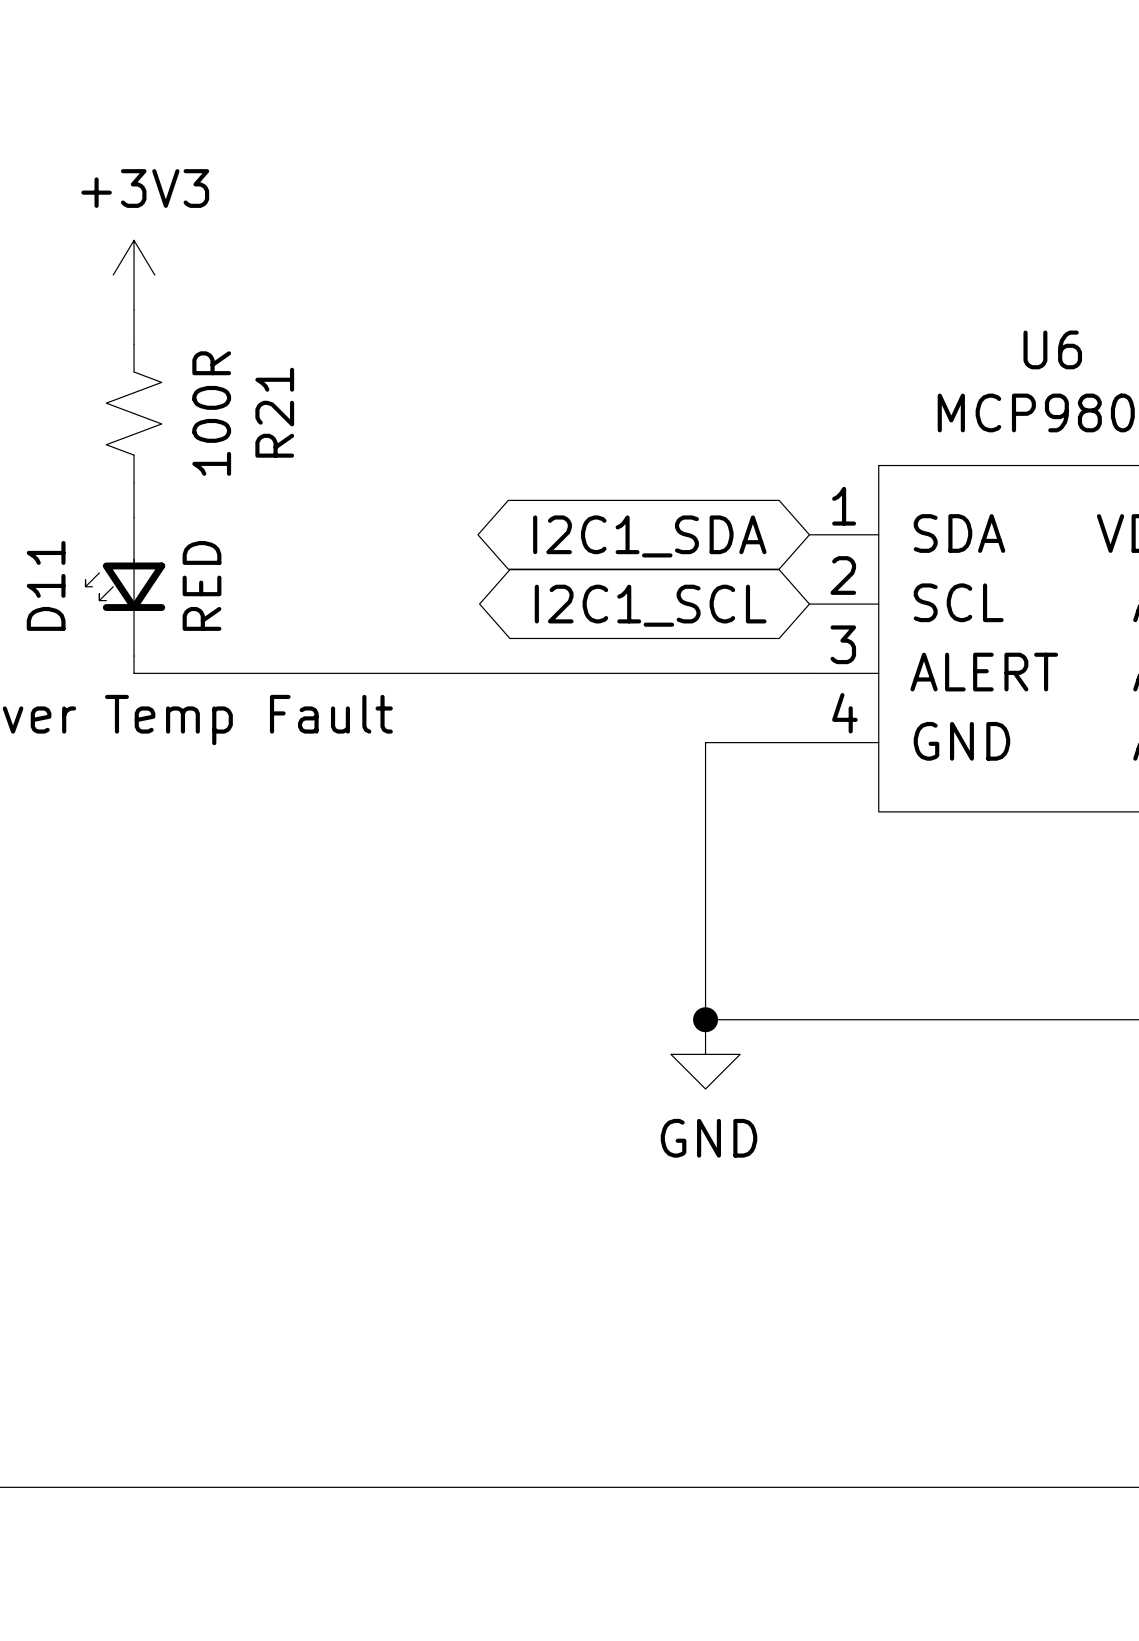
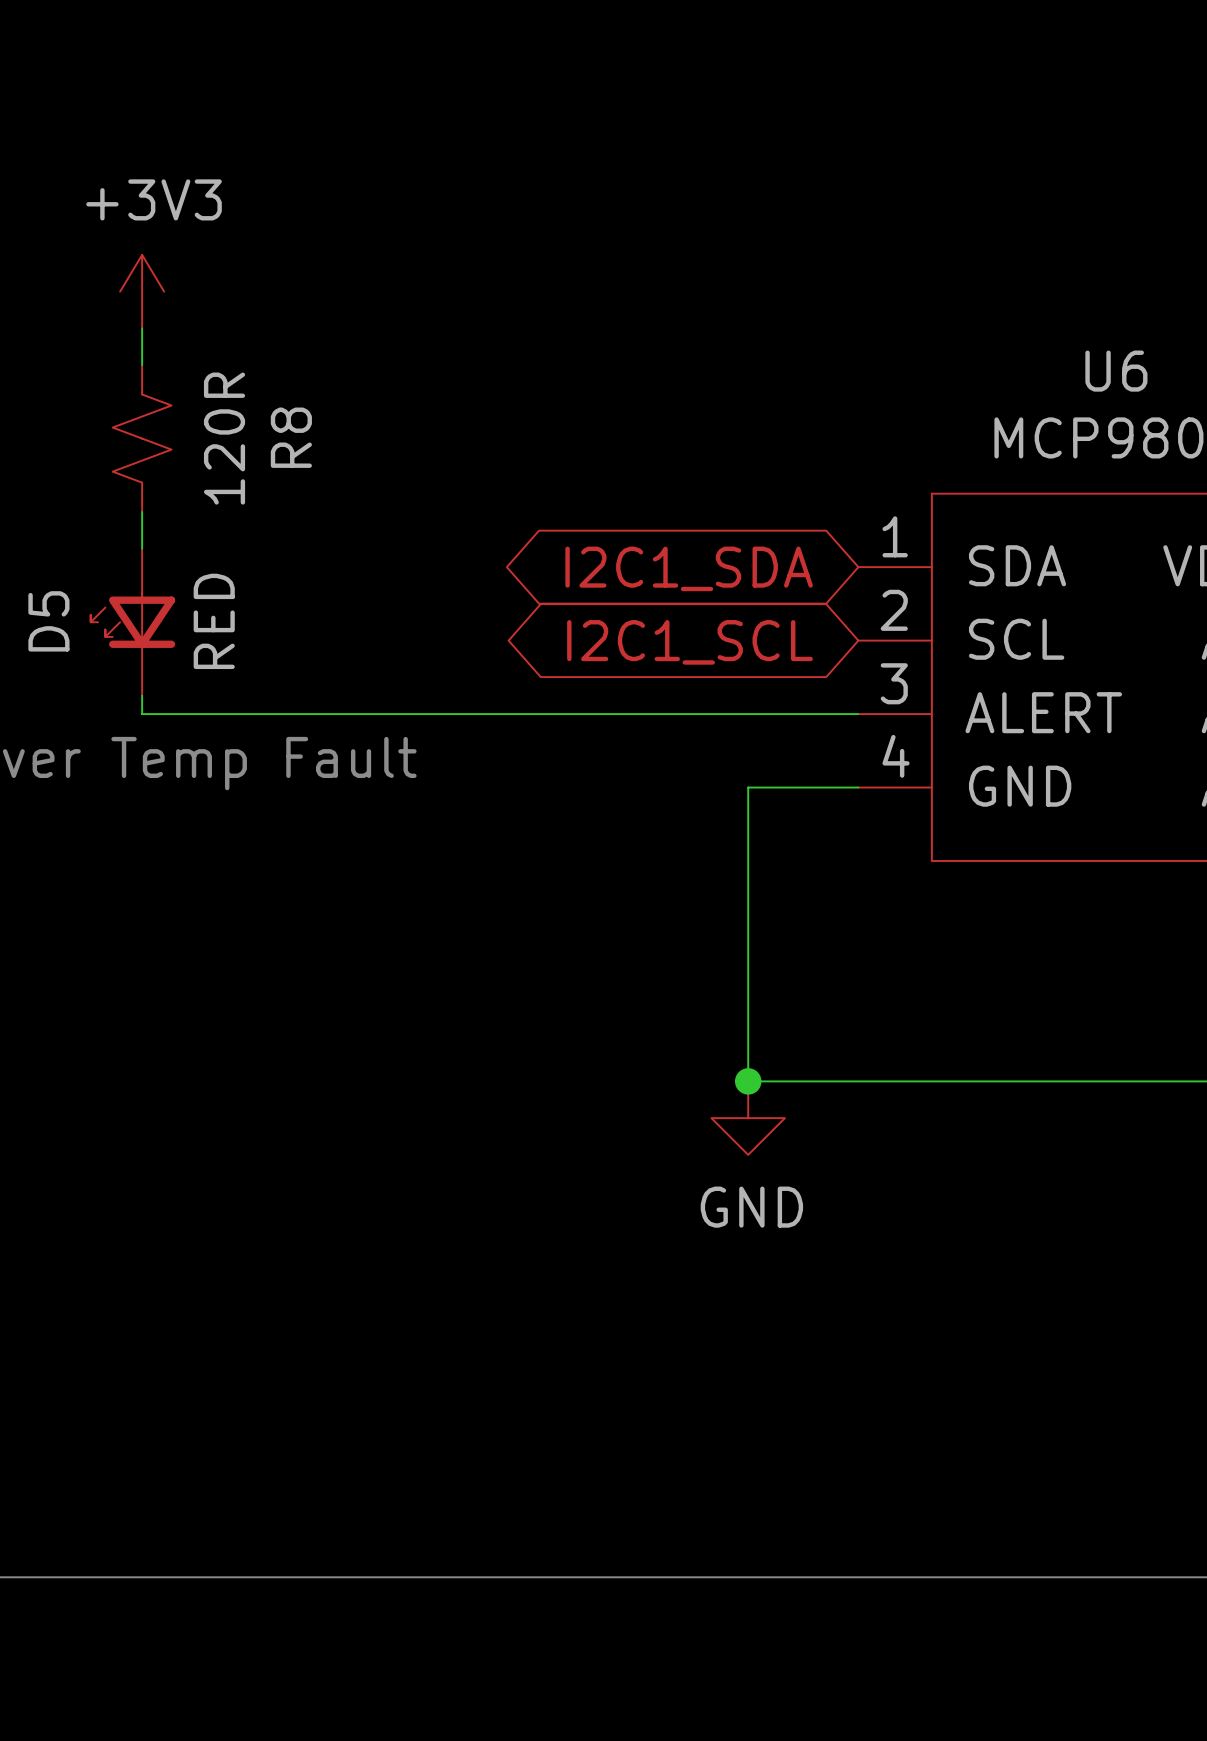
R21 name: R21 (274, 412) -> R8 (291, 437)
R21 value: 100R (211, 413) -> 120R (224, 438)
D11 name: D11 (46, 585) -> D5 (48, 621)

